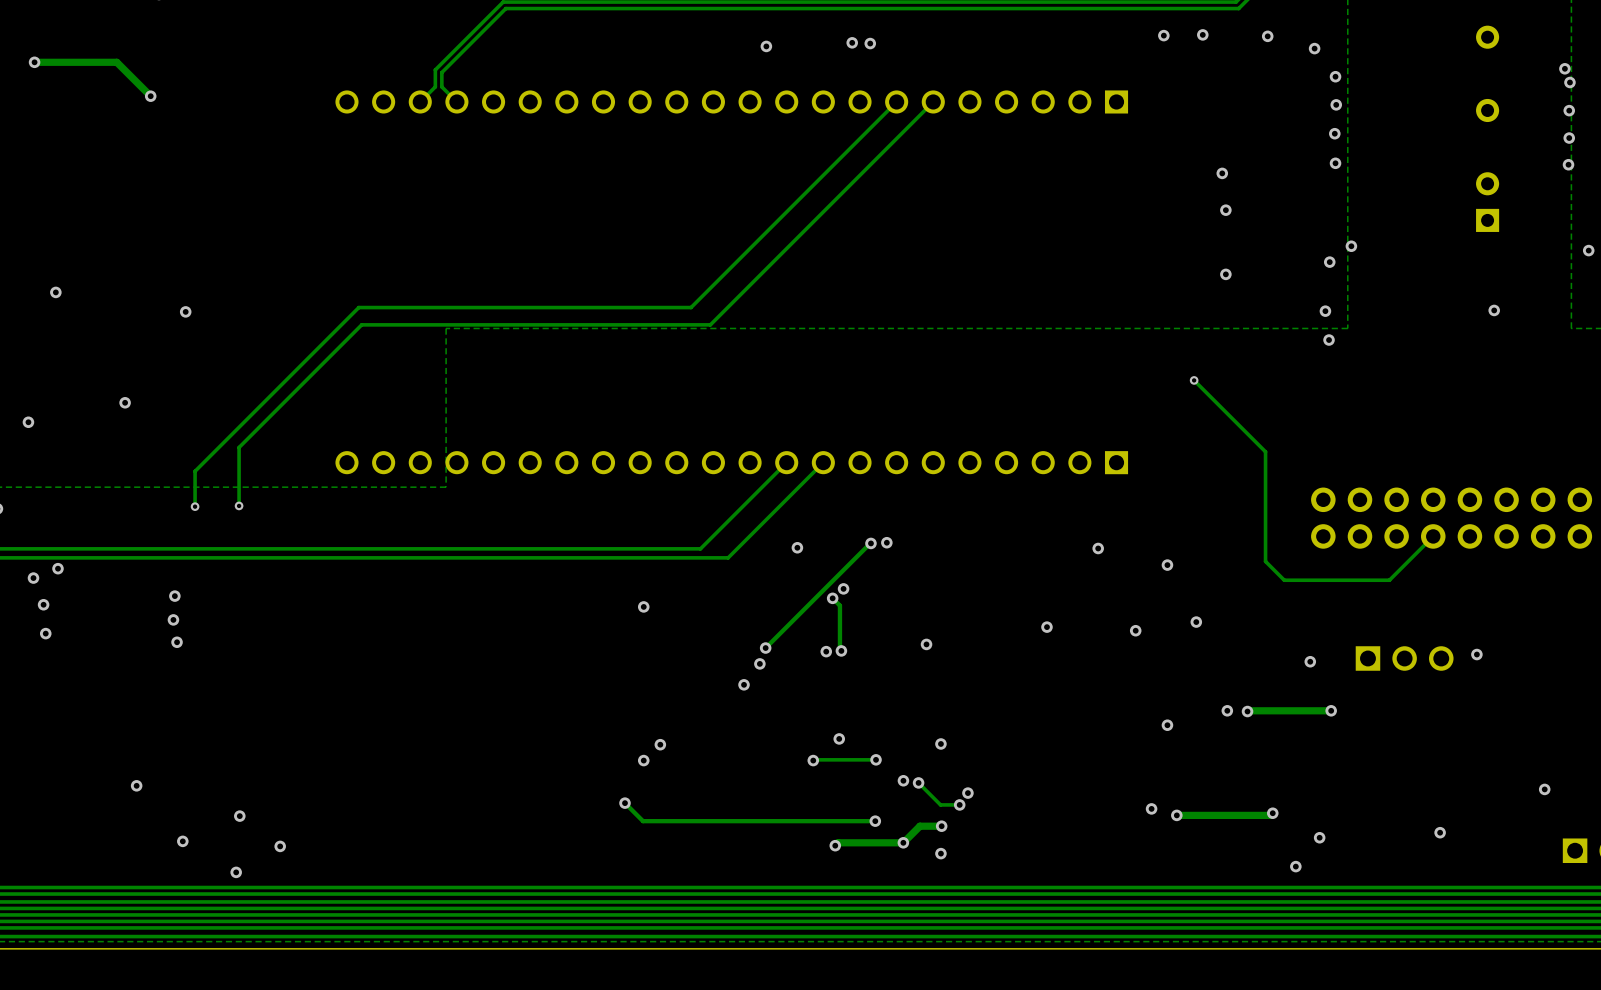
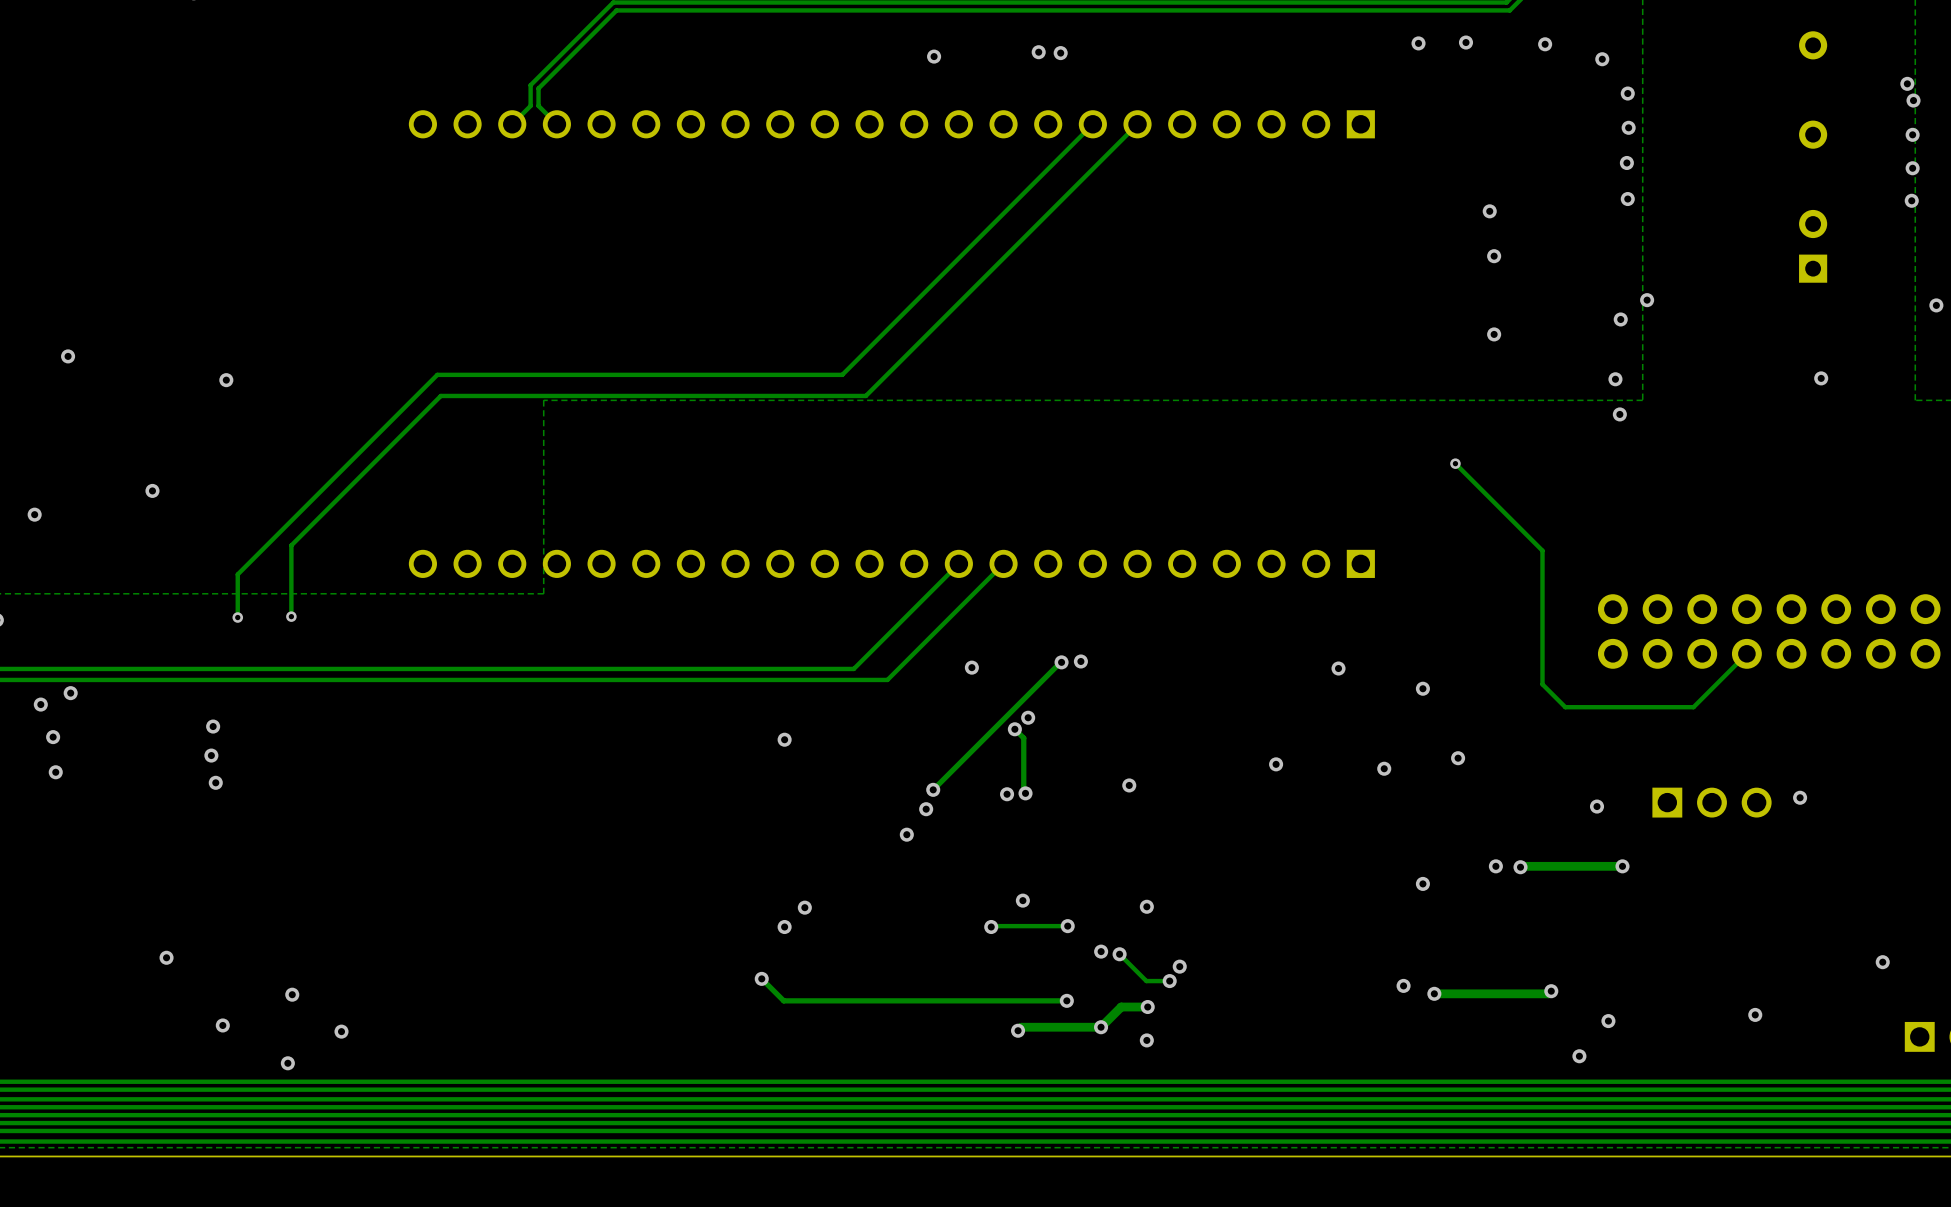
track: (34, 62) (116, 62) (150, 96) -> none
via: (34, 62) -> none
via: (150, 96) -> none

